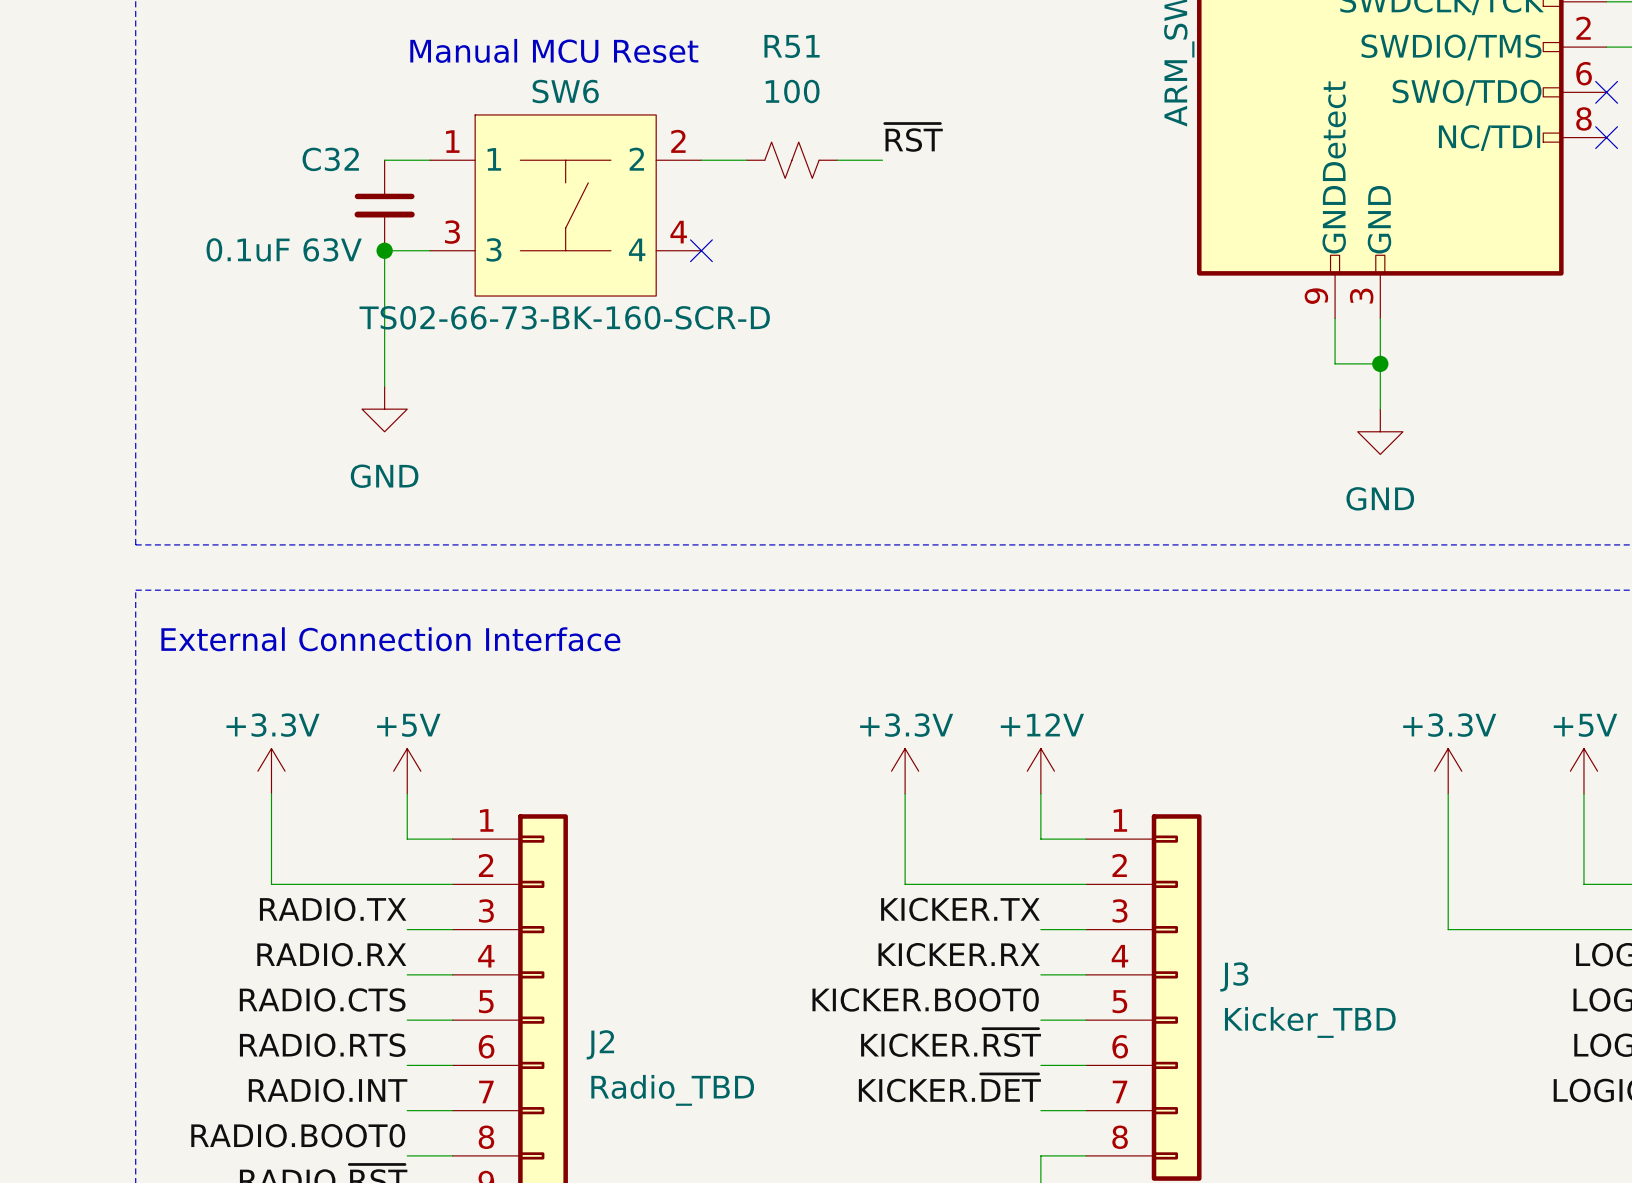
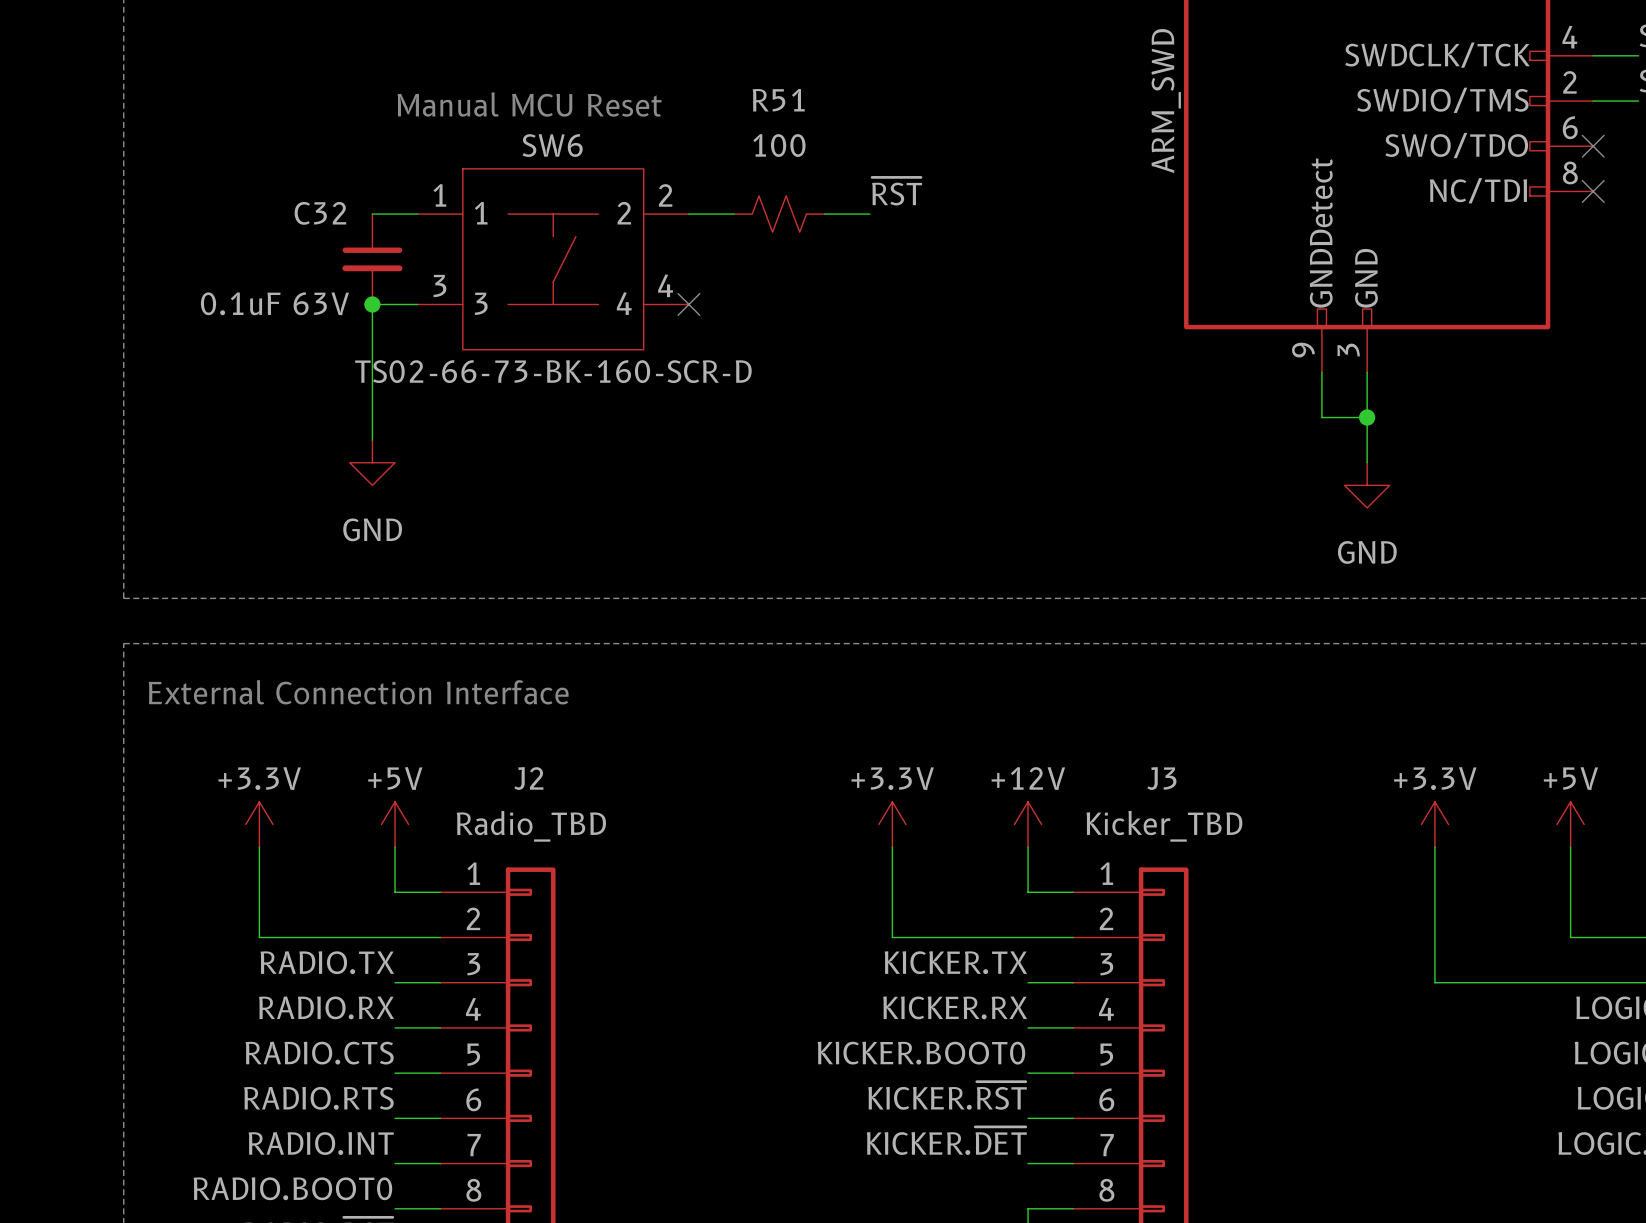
J3 name position: J3 (1234, 976) -> J3 (1161, 778)
J3 value position: Kicker_TBD (1310, 1022) -> Kicker_TBD (1164, 826)
J2 name position: J2 (600, 1044) -> J2 (528, 778)
J2 value position: Radio_TBD (672, 1090) -> Radio_TBD (531, 826)

